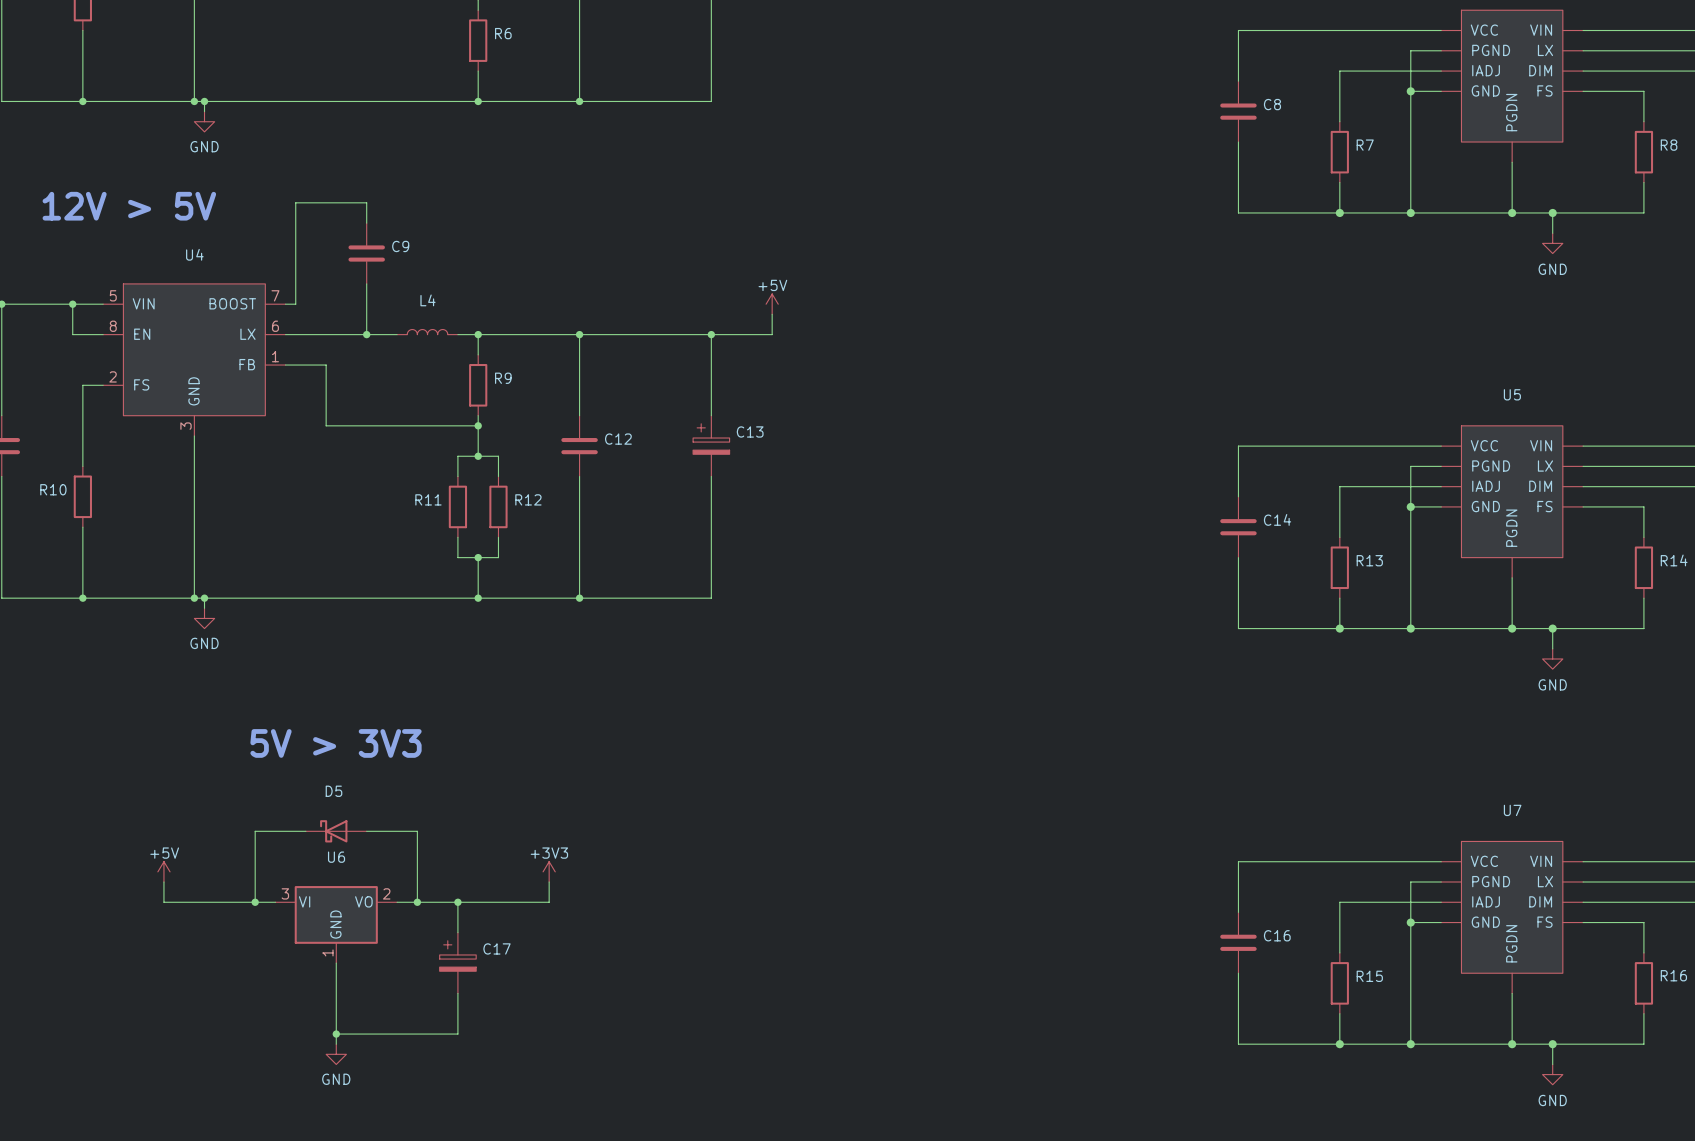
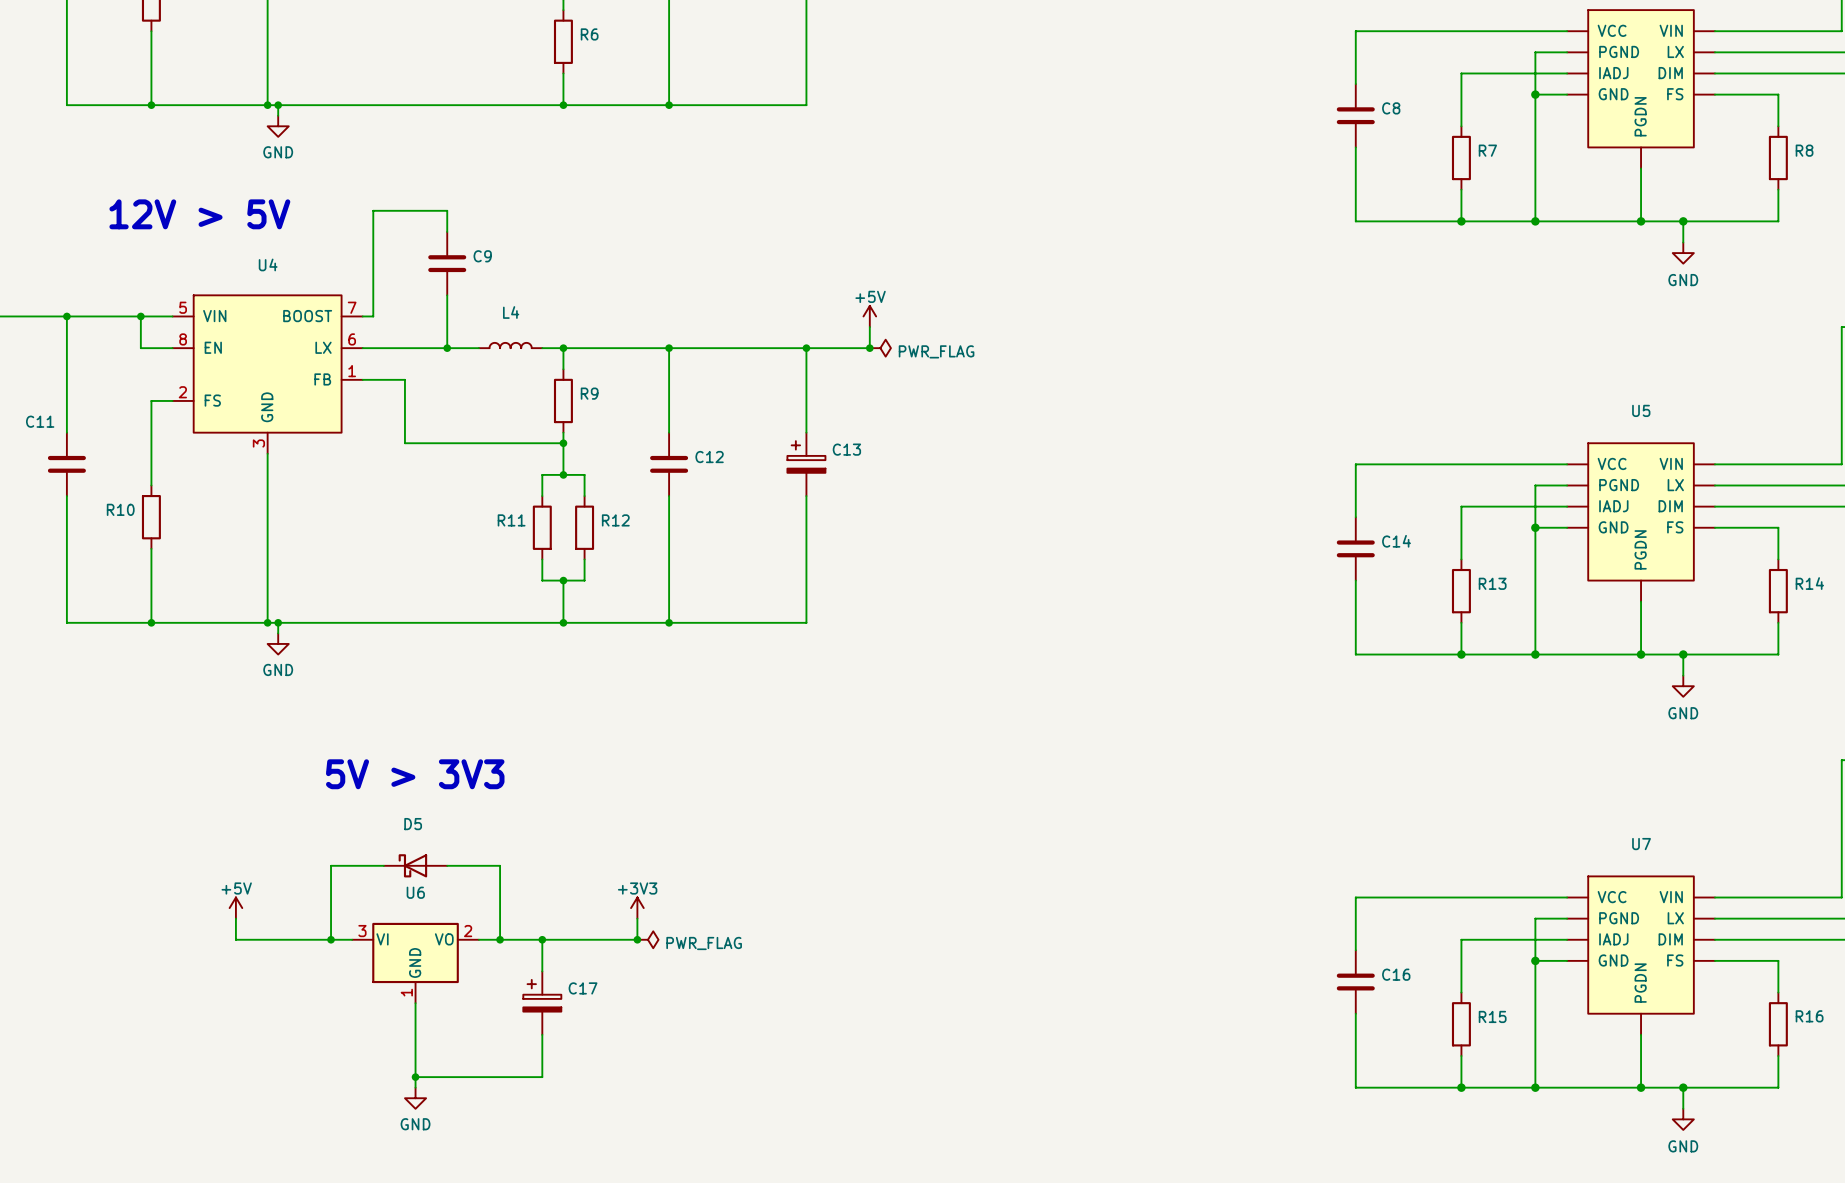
junction: none -> (869, 348)
power symbol: none -> PWR_FLAG (880, 348)
junction: none -> (637, 939)
power symbol: none -> PWR_FLAG (647, 939)

